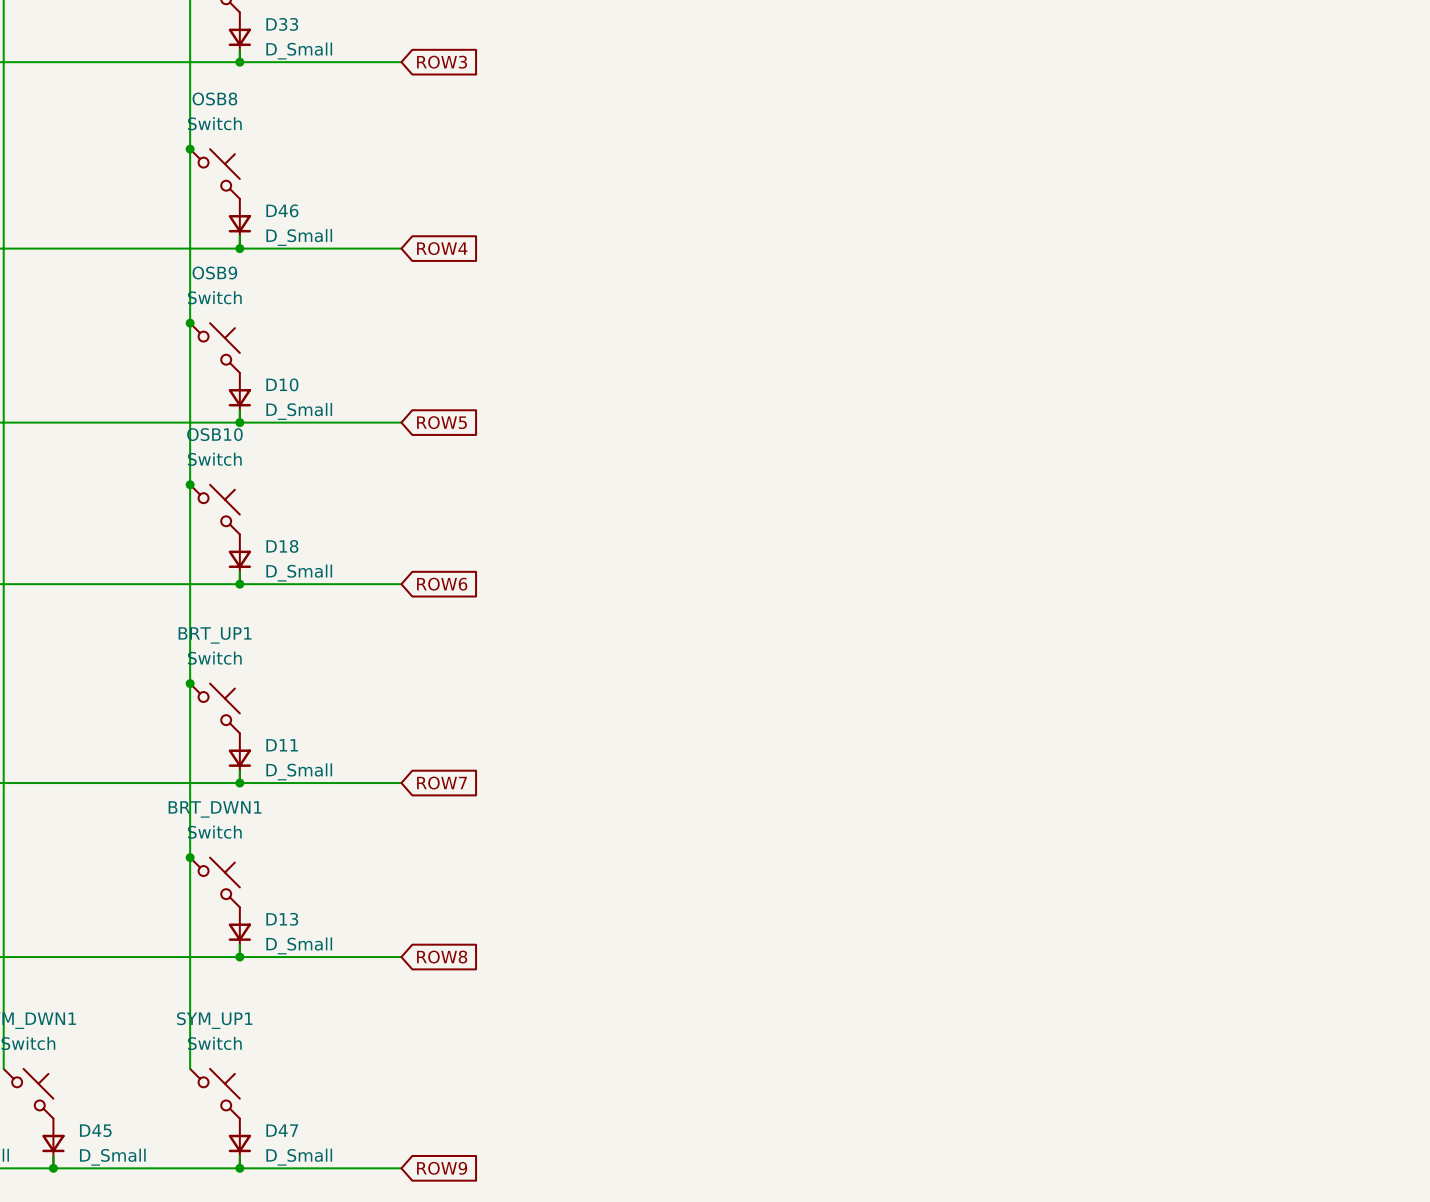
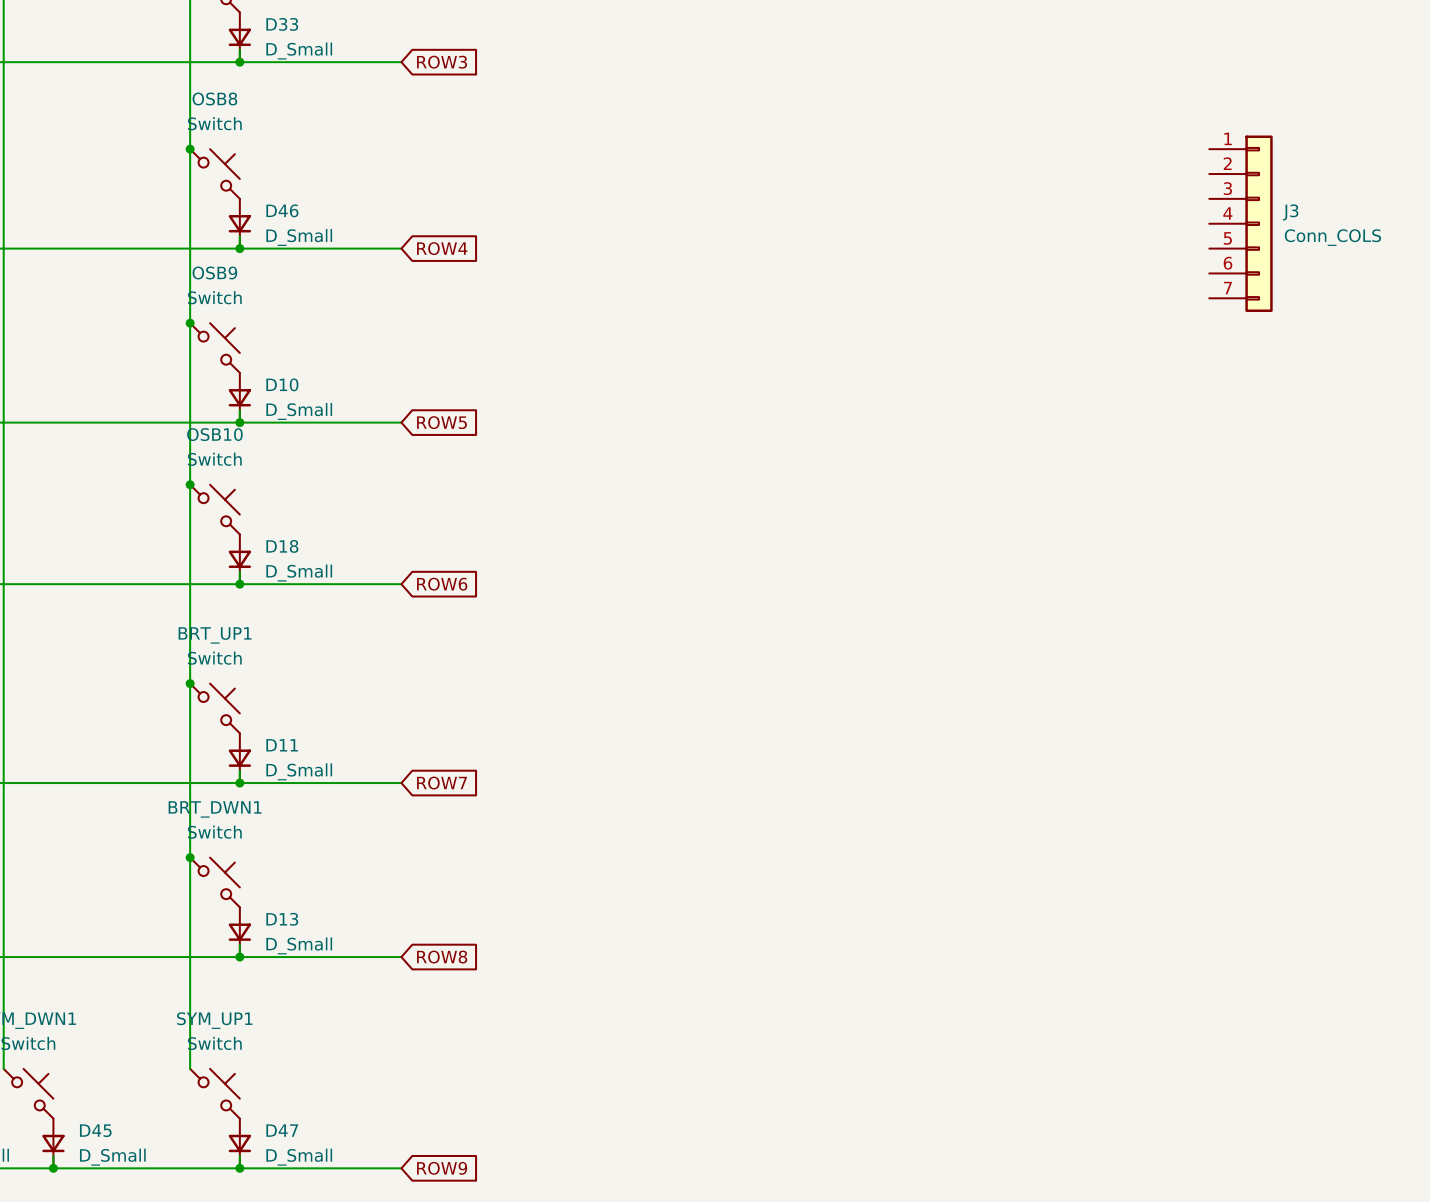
J3: none -> Conn_COLS (1240, 223)

